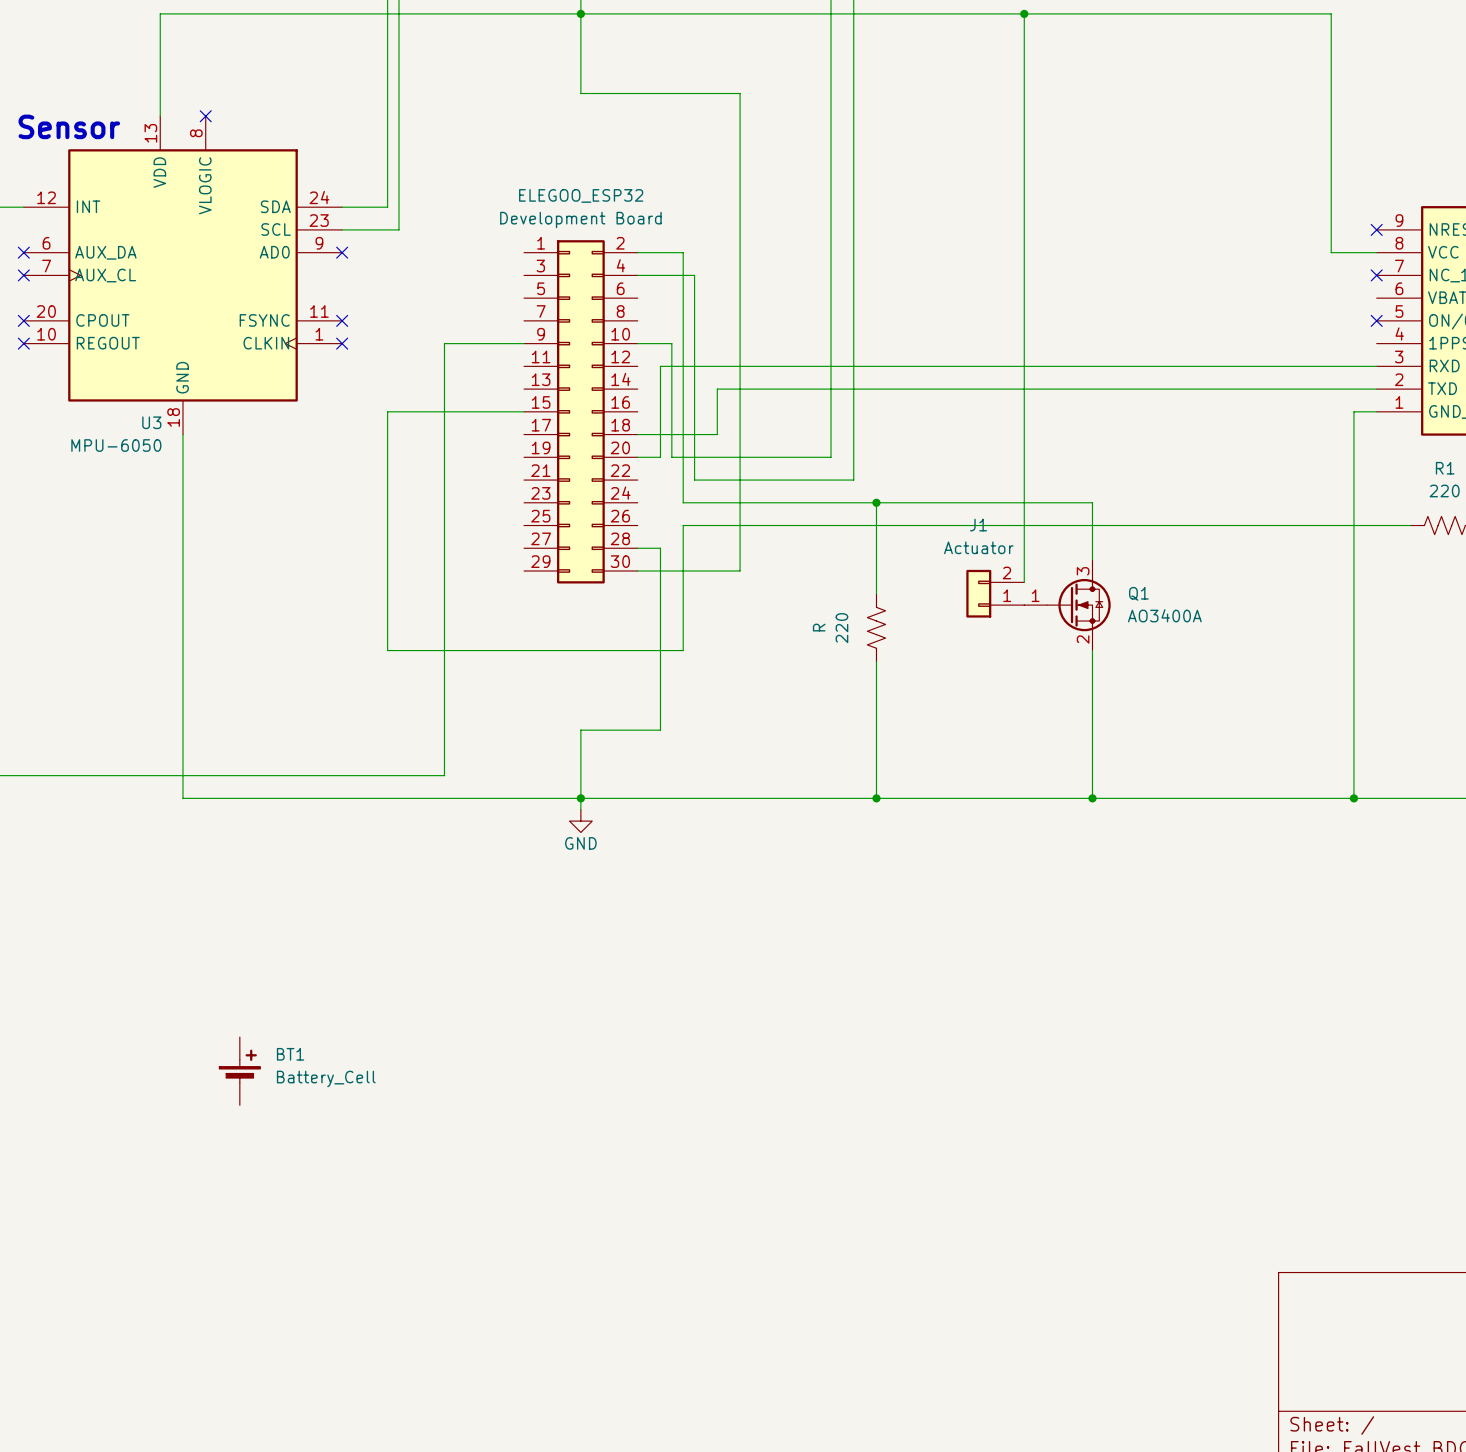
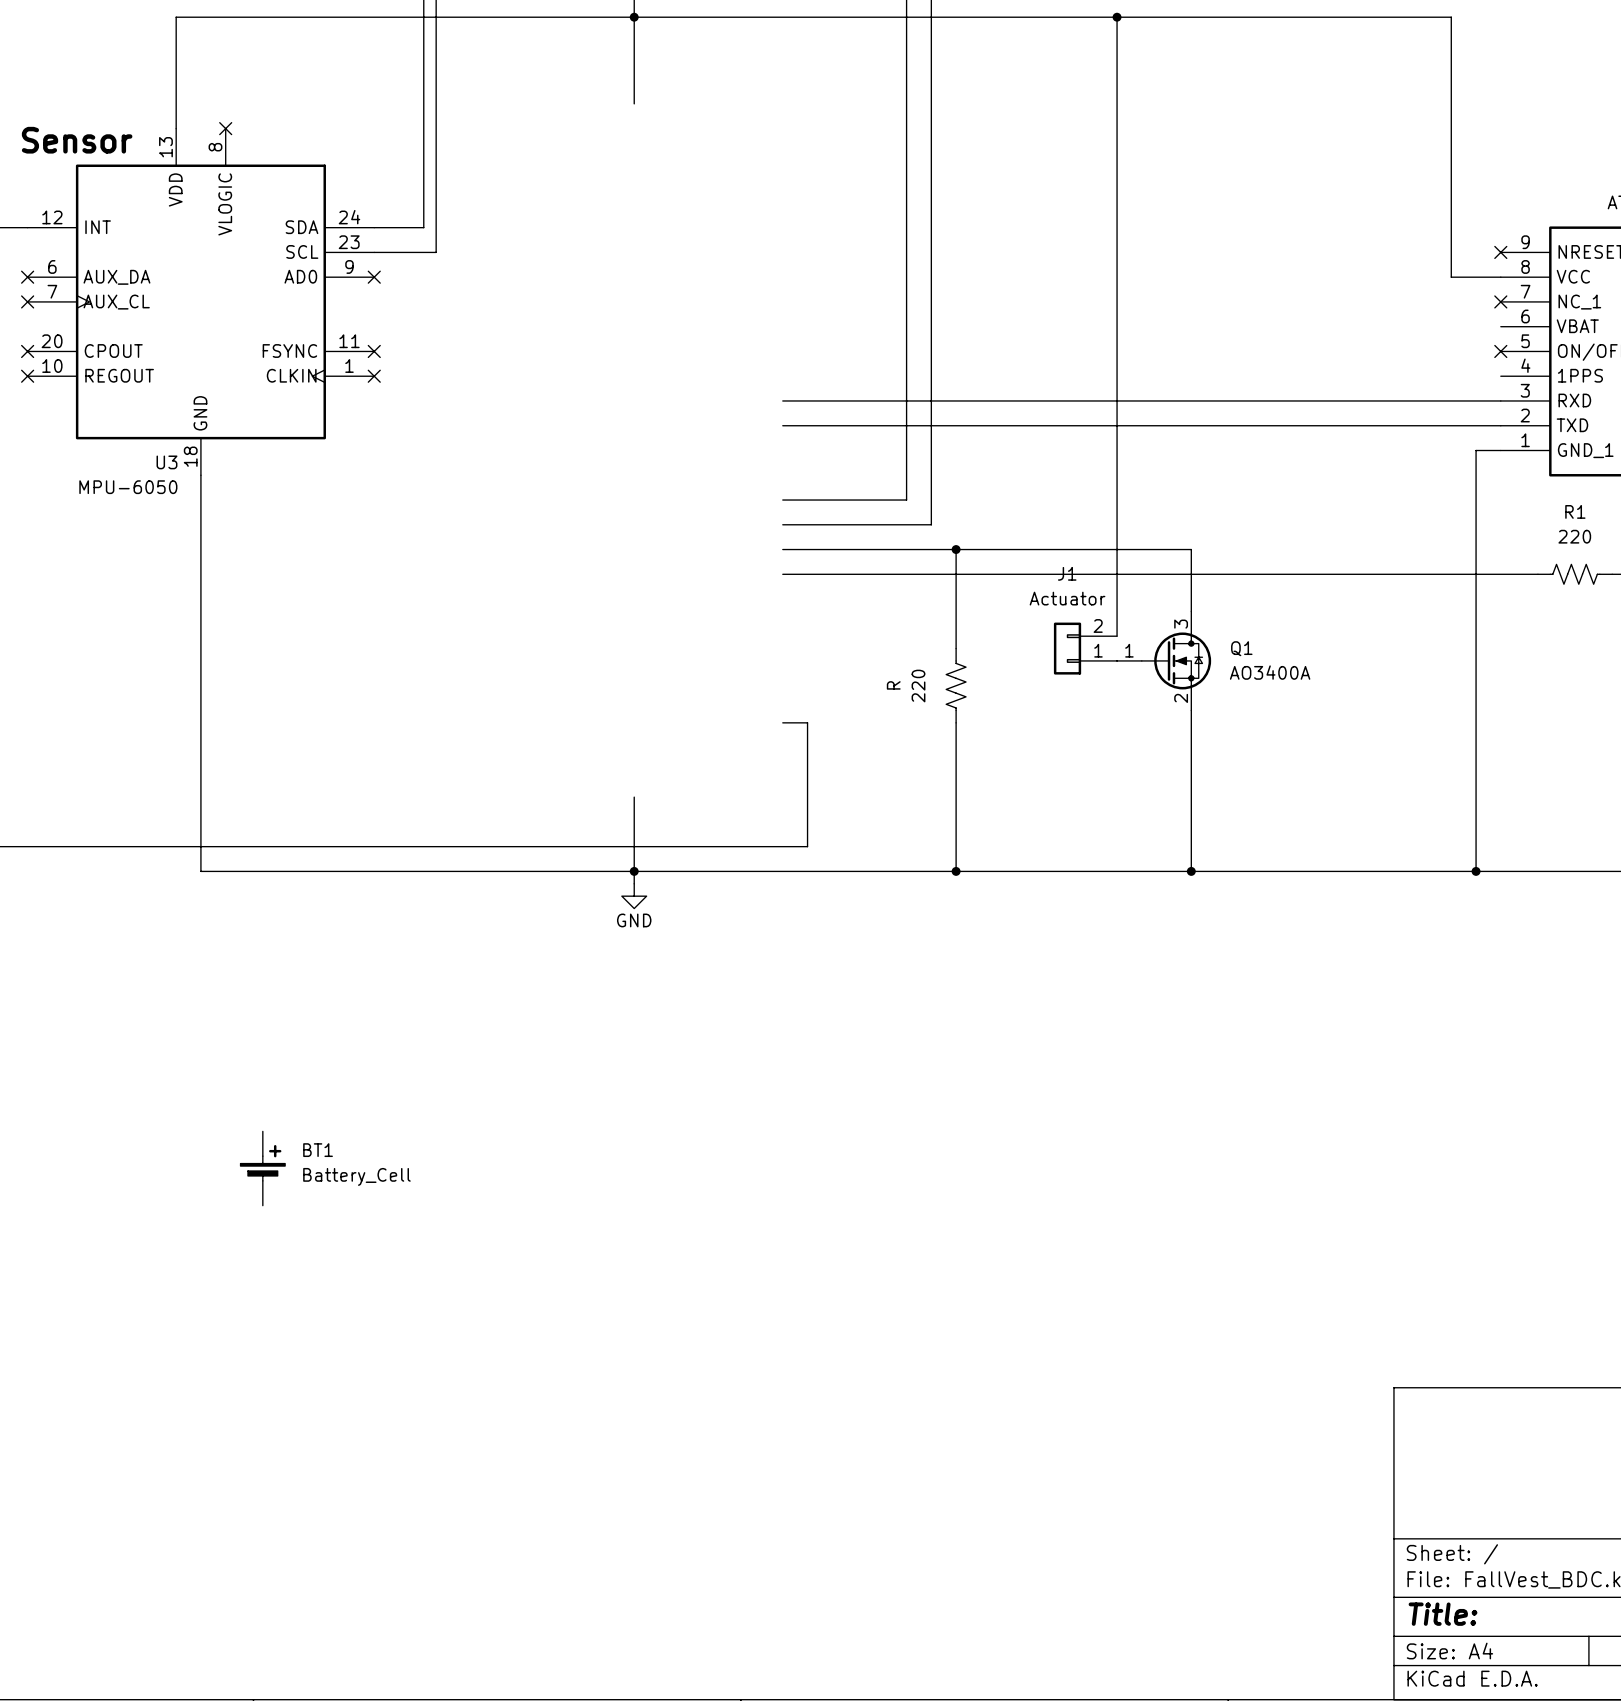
wire: (580, 93) (740, 93) (740, 570) (637, 570) -> none
wire: (637, 252) (683, 252) (683, 502) (717, 502) -> none
wire: (637, 275) (694, 275) (694, 480) (717, 480) -> none
wire: (524, 343) (444, 343) (444, 775) -> (782, 722) (807, 722) (807, 846) (485, 846)
wire: (637, 343) (671, 343) (671, 457) (717, 457) -> none
wire: (717, 366) (660, 366) (660, 457) (637, 457) -> none
wire: (717, 389) (717, 434) (637, 434) -> none
wire: (524, 411) (387, 411) (387, 650) (683, 650) (683, 525) (717, 525) -> none
ELEGOO_ESP32: Development Board (580, 411) -> none
wire: (637, 548) (660, 548) (660, 730) (580, 730) -> none

